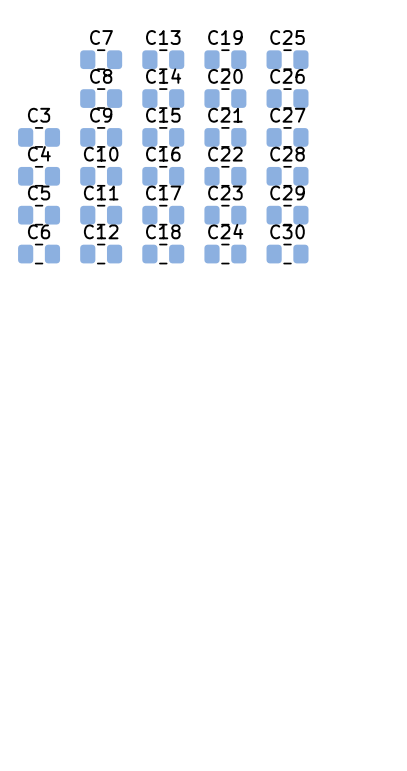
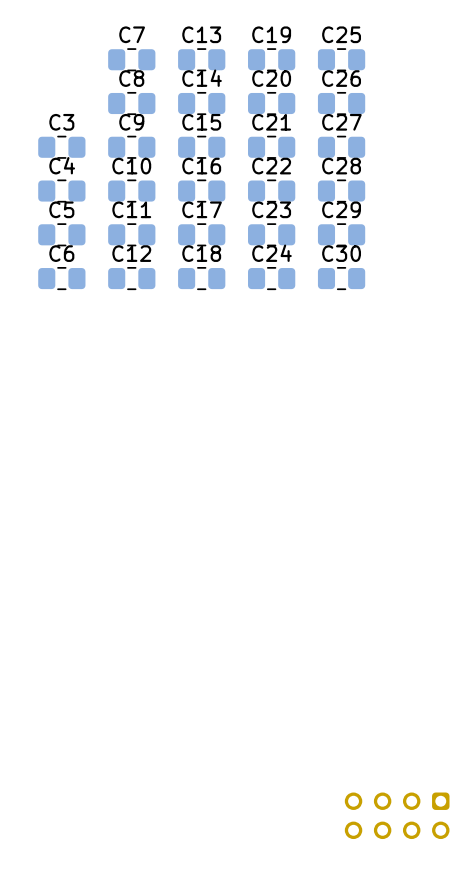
part: none -> (397, 815)

